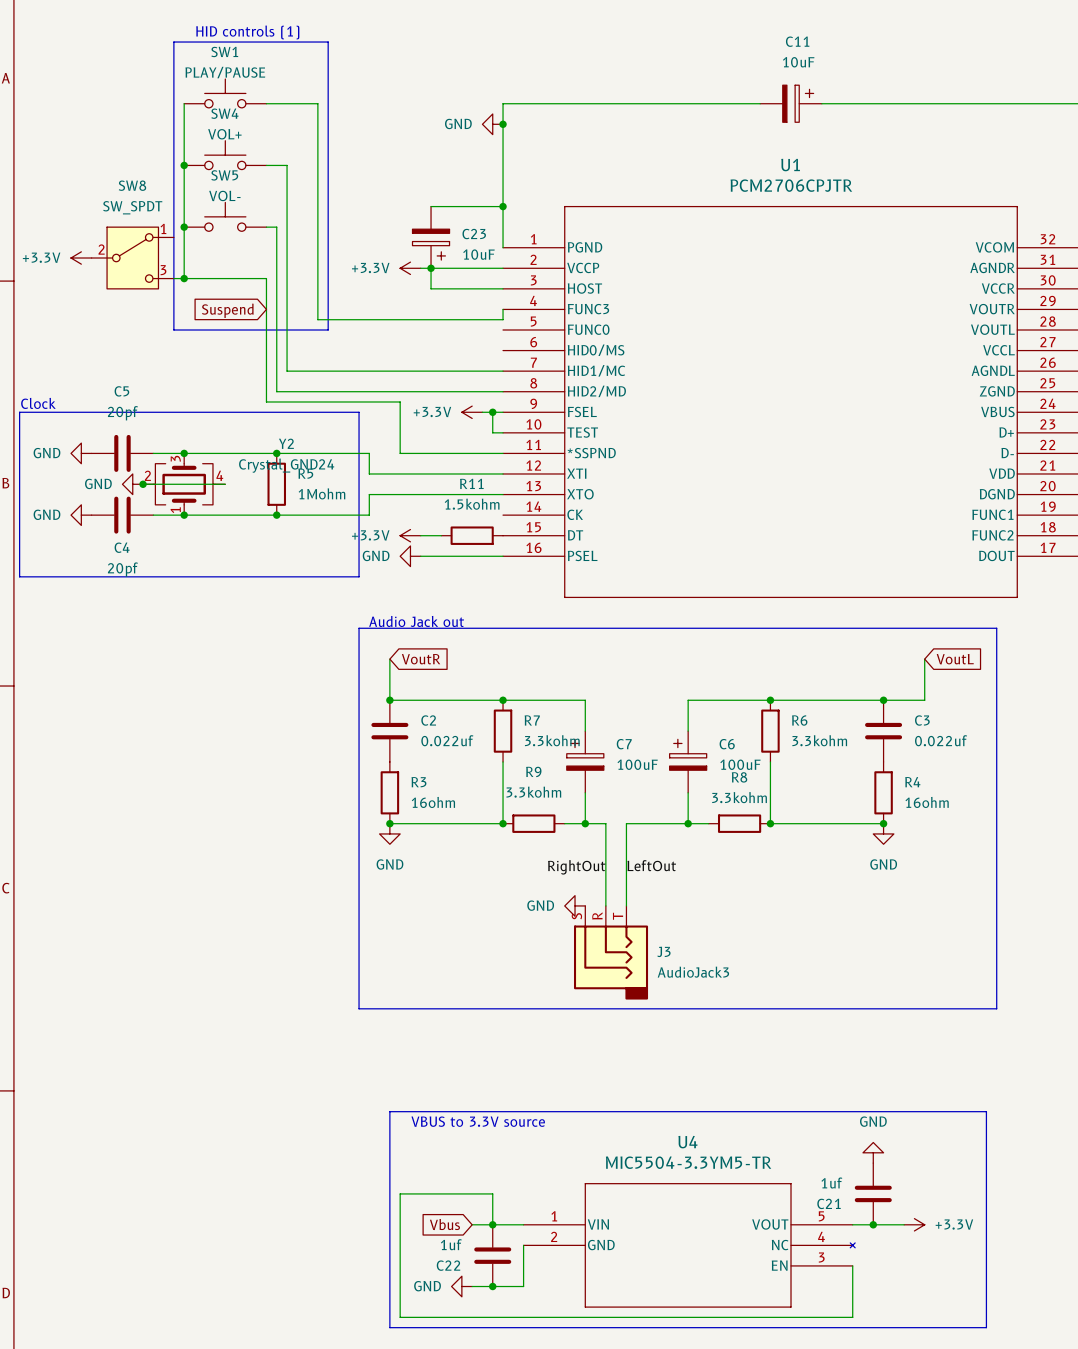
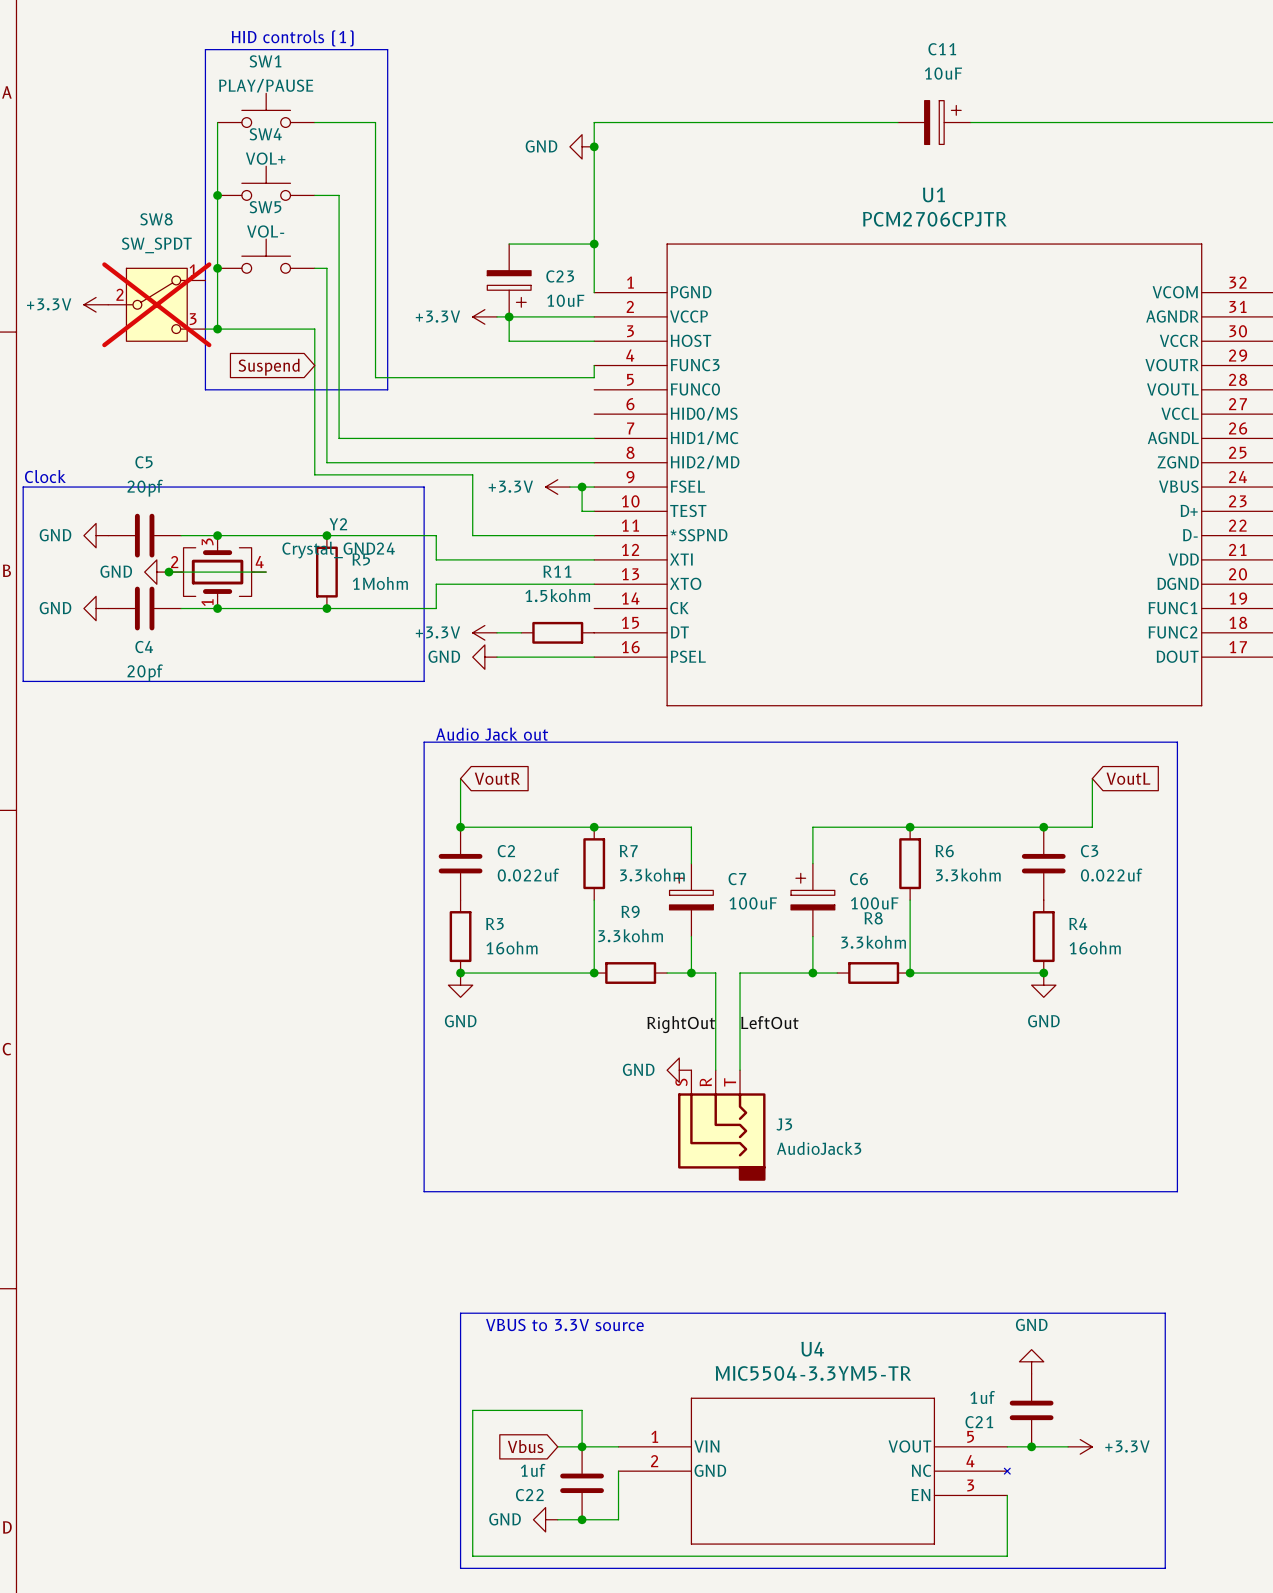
SW8 do-not-place cross: none -> (156, 304)

